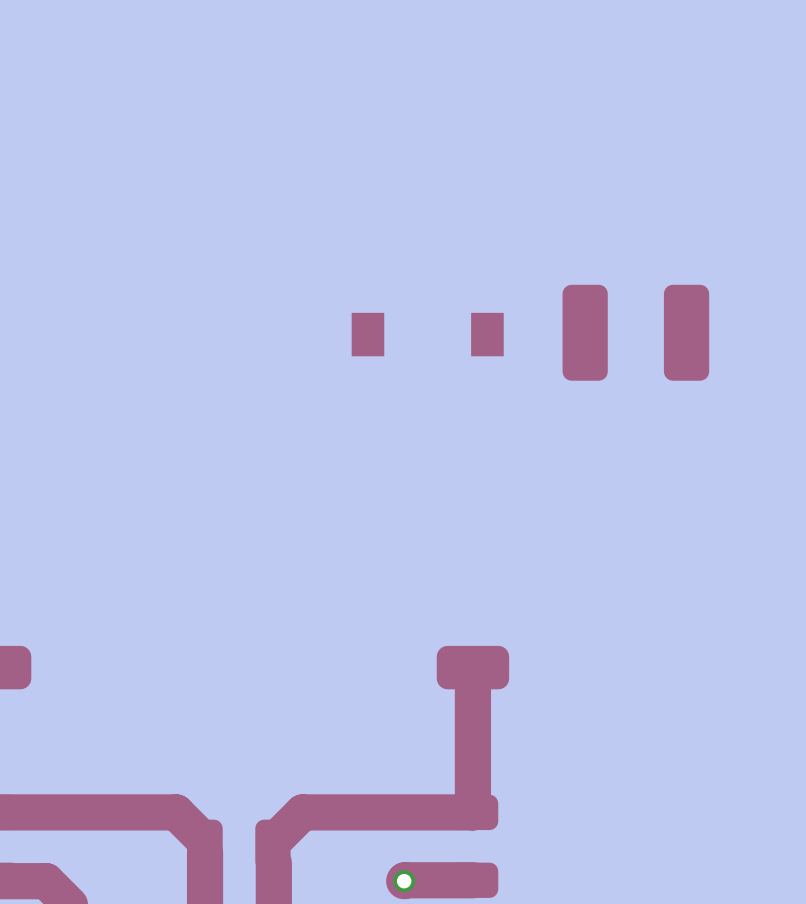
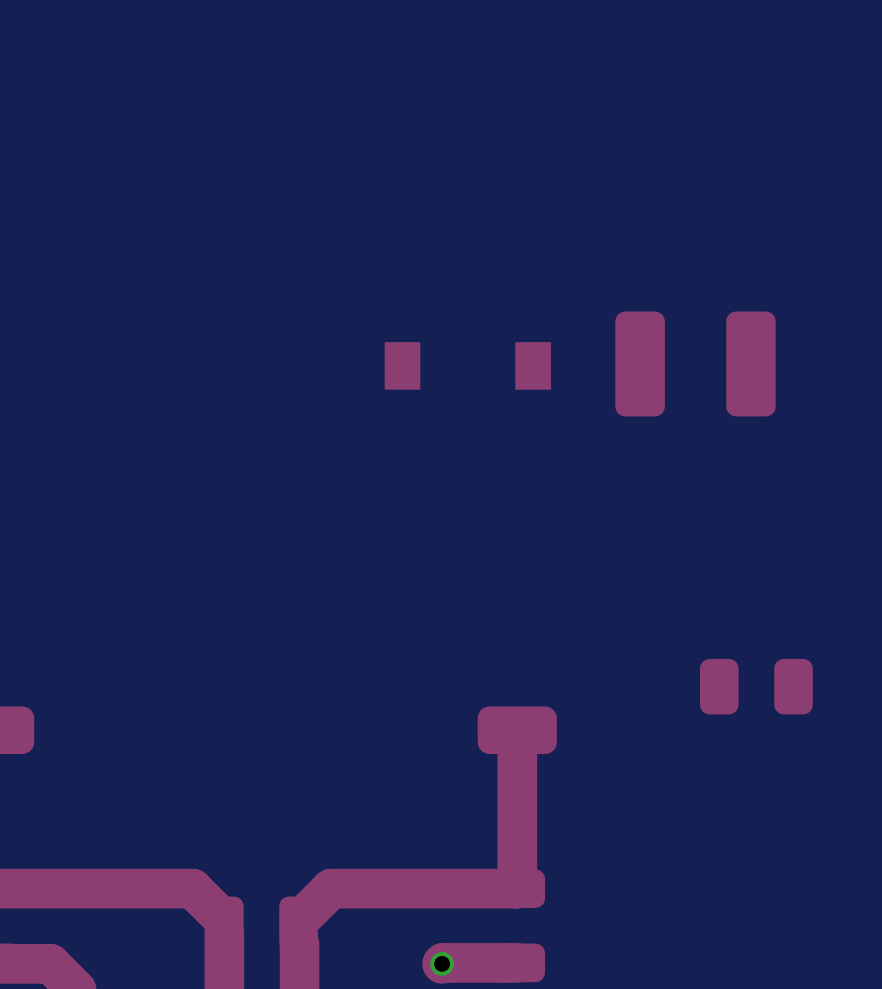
part: none -> (756, 686)

